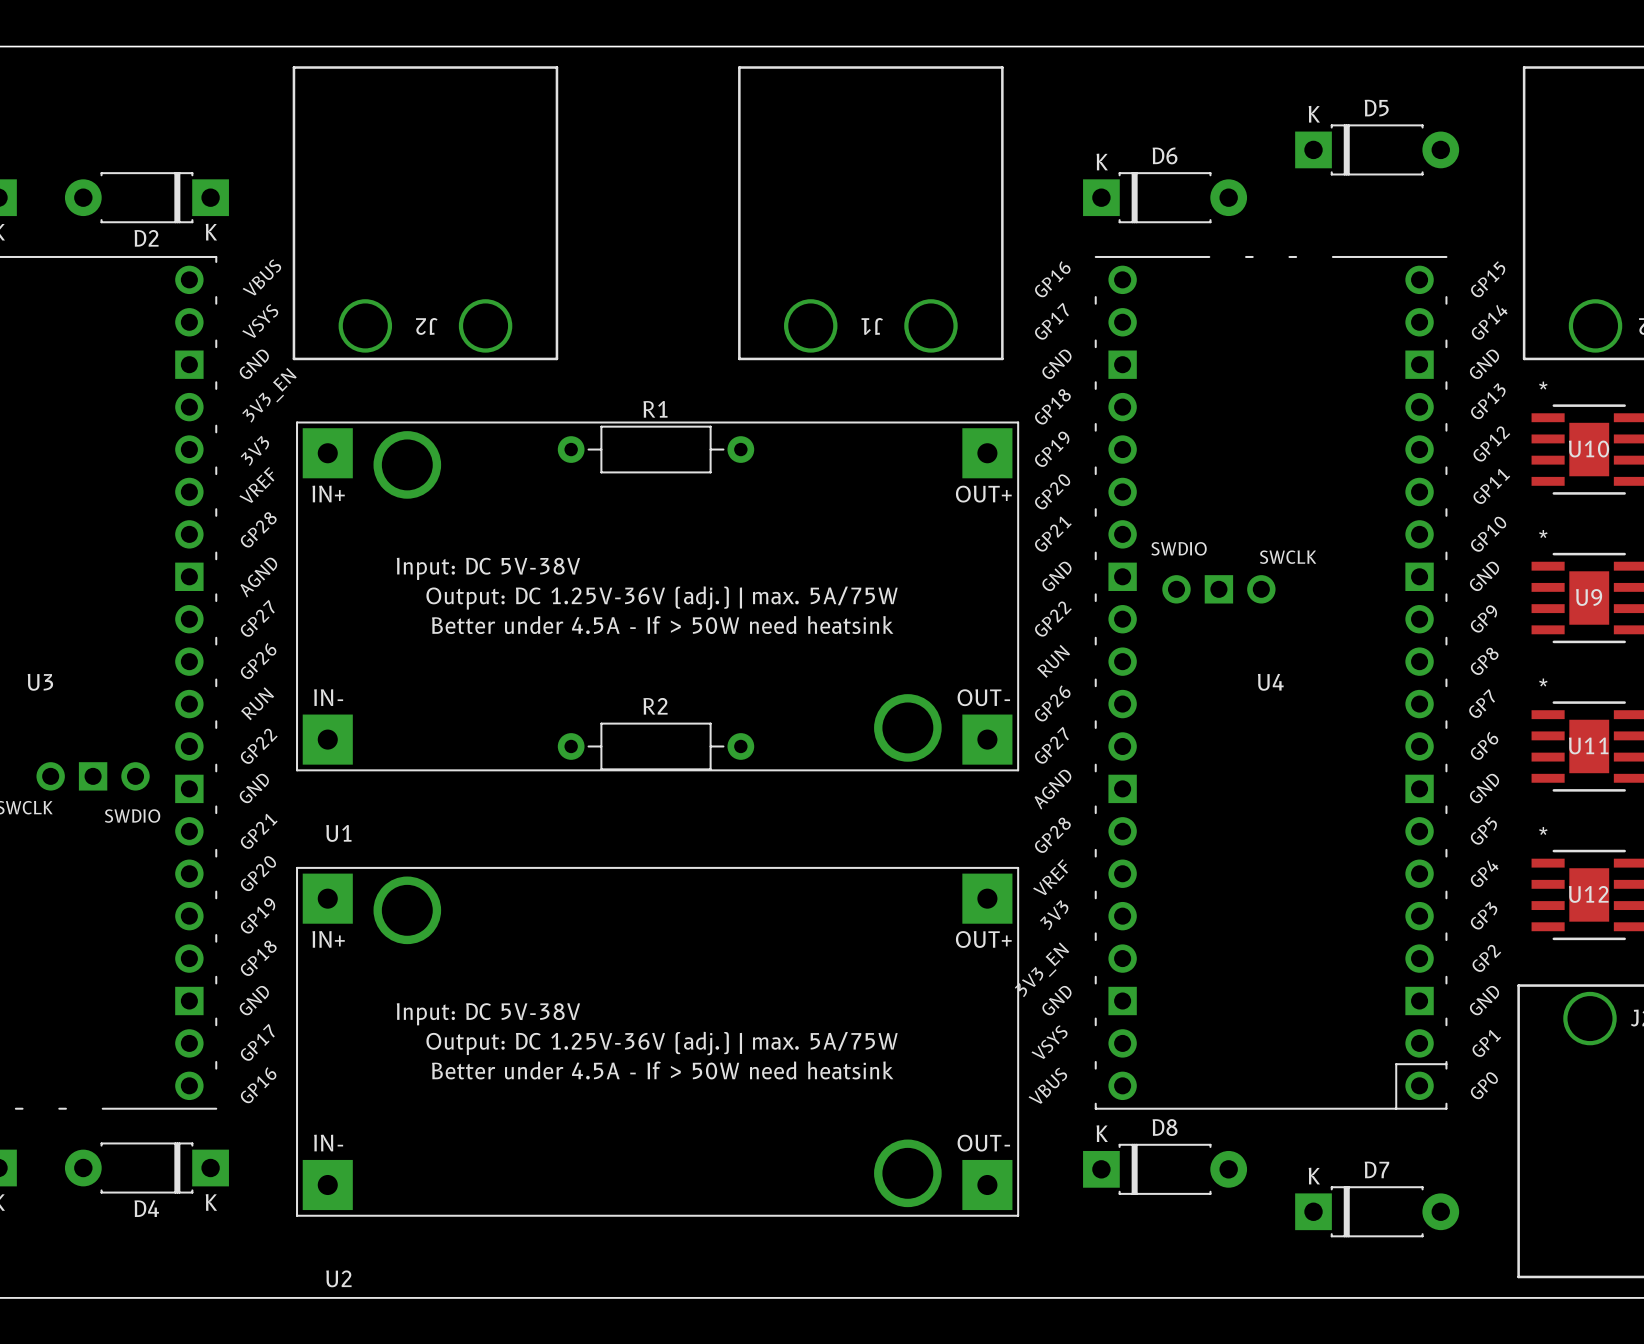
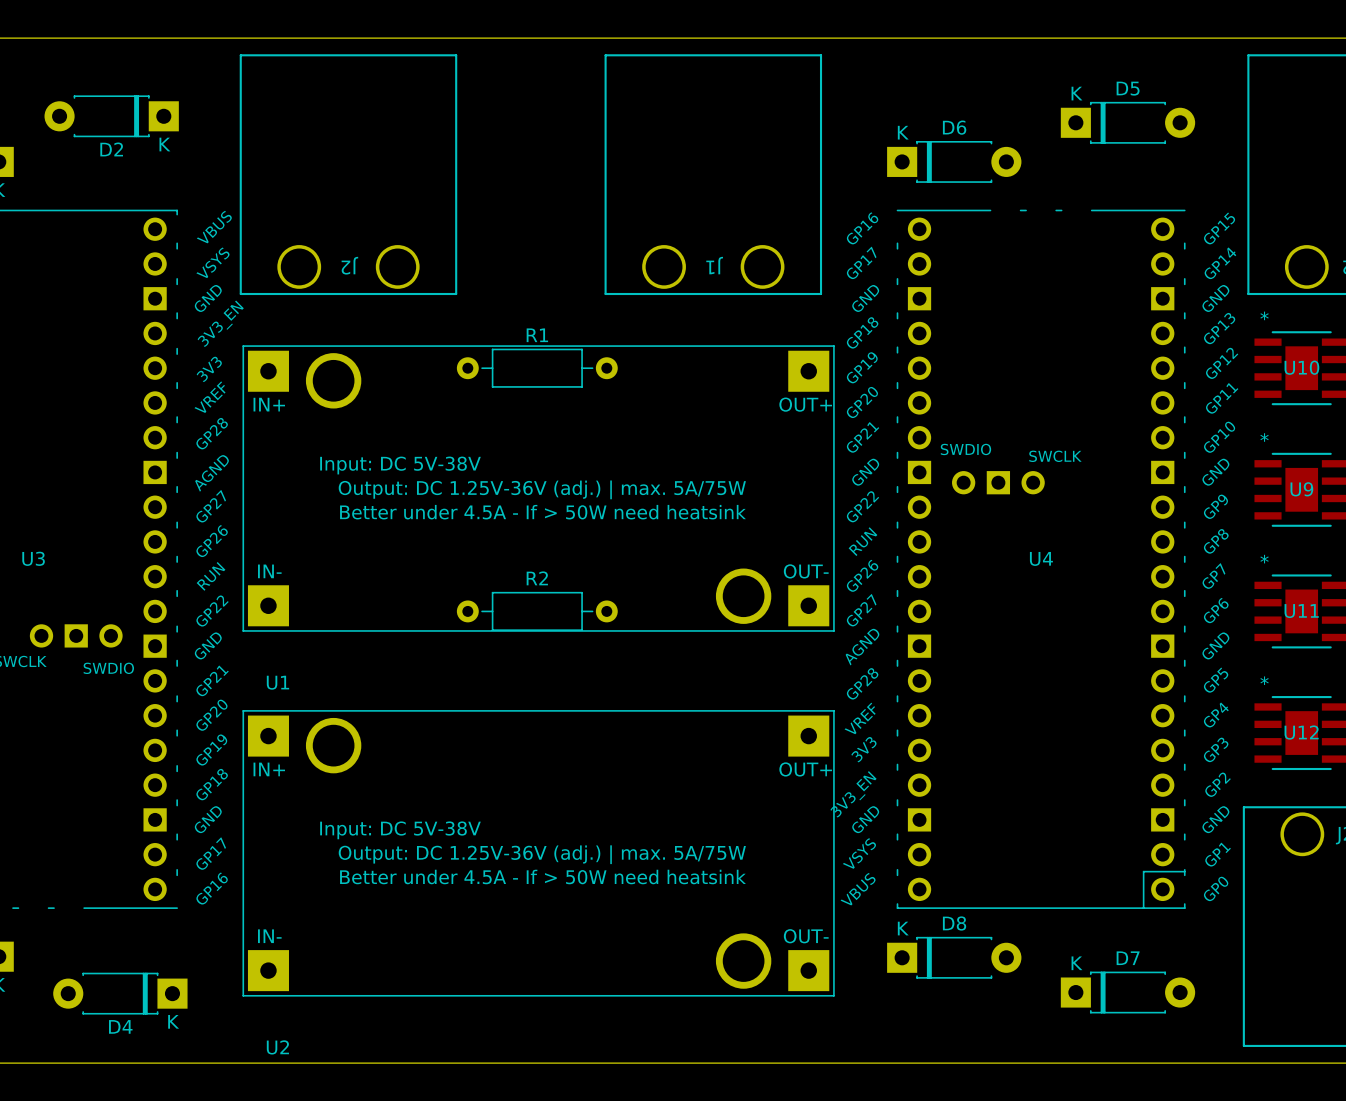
D2 position: (146, 197) -> (111, 116)
D4 position: (146, 1168) -> (120, 993)

